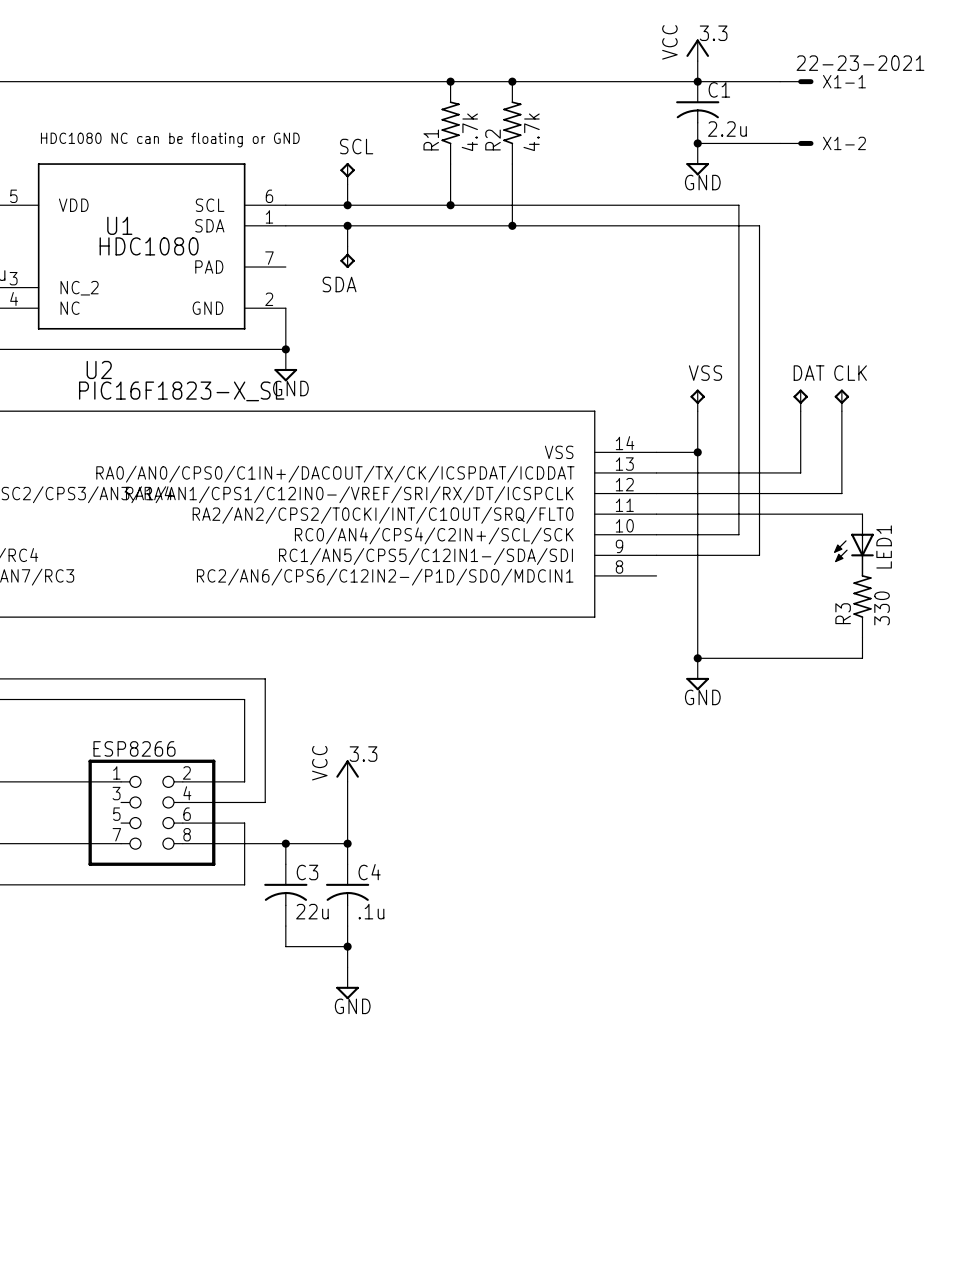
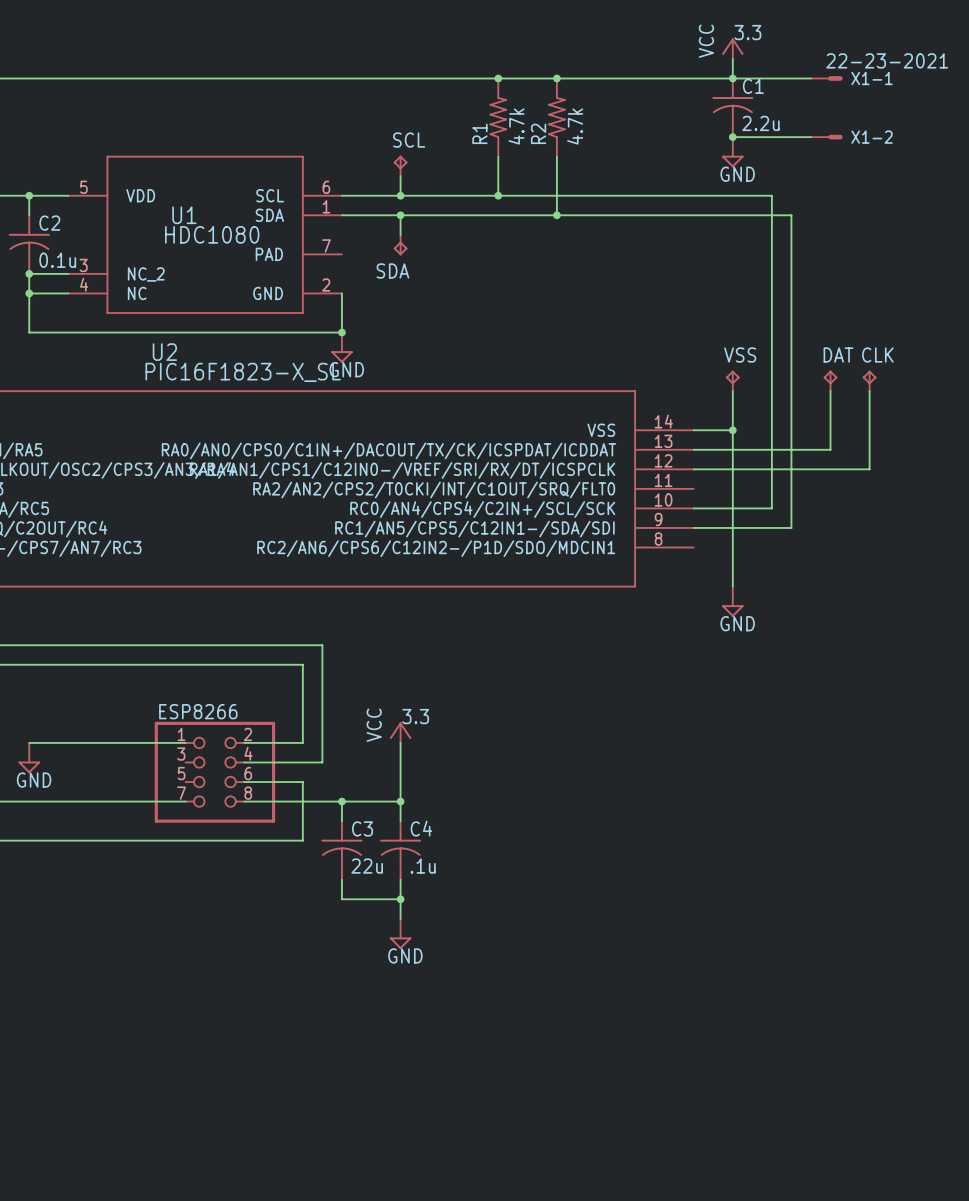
text: HDC1080 NC can be floating or GND (170, 140) -> none
wire: (656, 514) (862, 514) -> none
LED1: (853, 545) -> none
R3: 330 (862, 596) -> none
wire: (697, 617) (697, 658) (862, 658) (862, 637) -> none
junction: (697, 658) -> none
power symbol position: GND (697, 674) -> GND (732, 601)

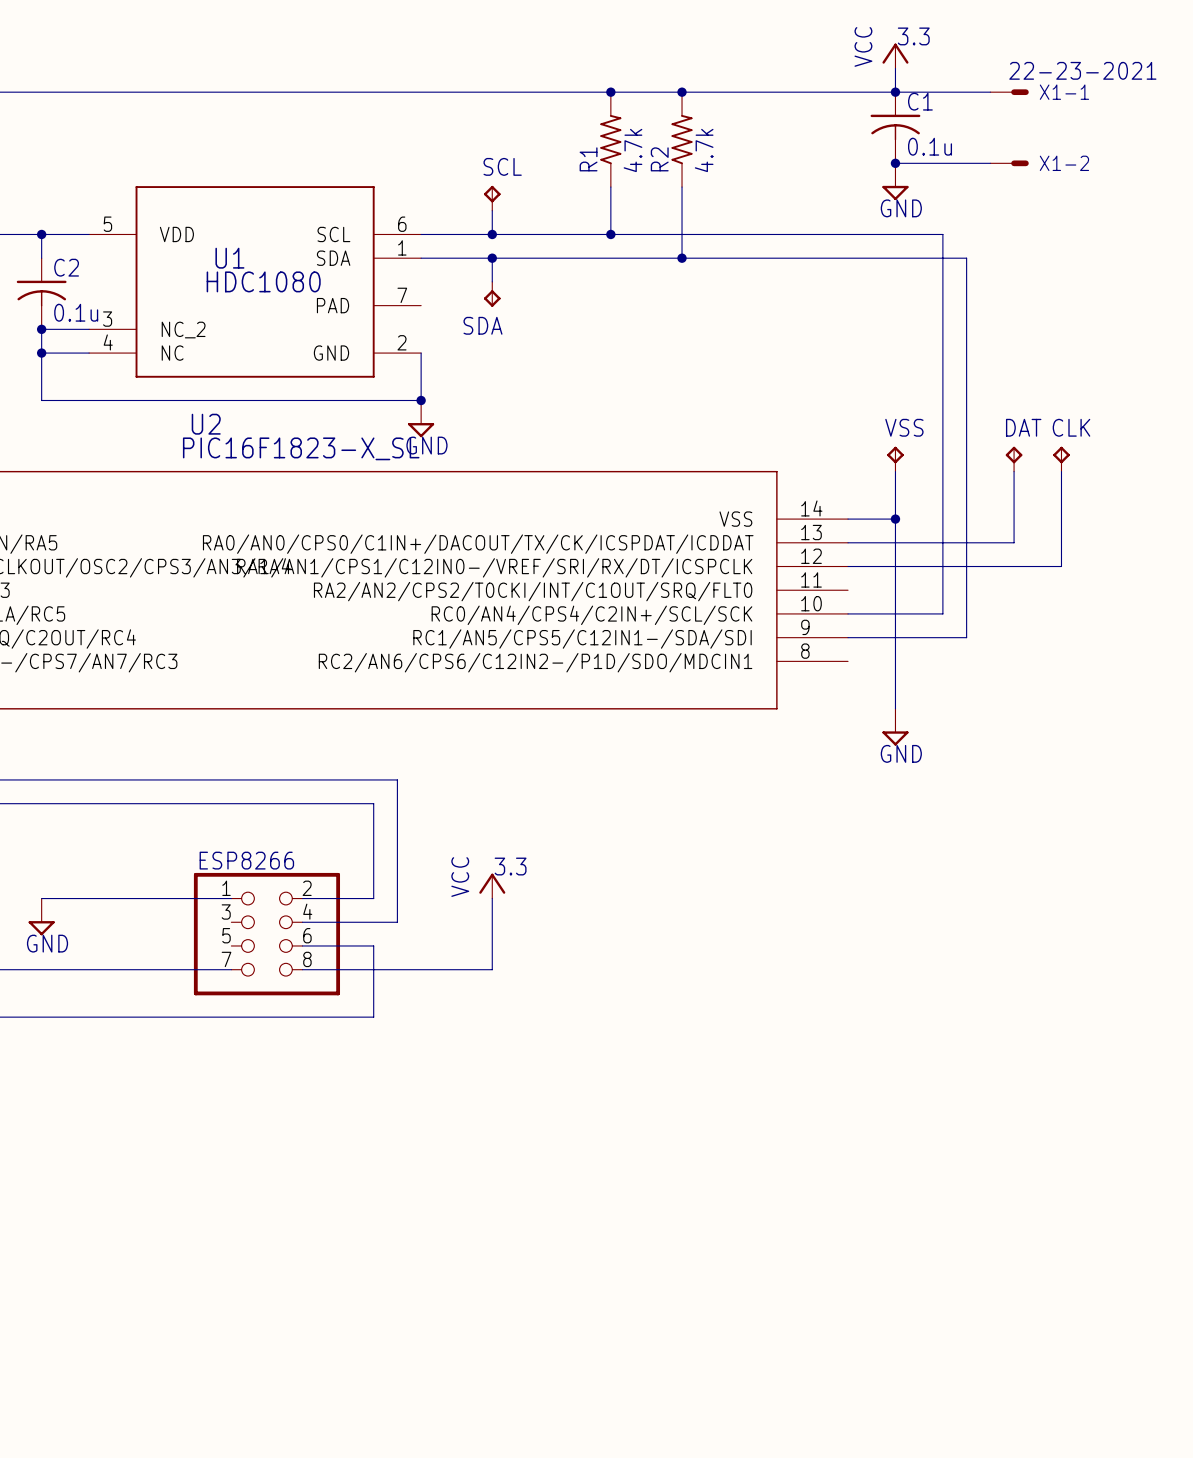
C1 value: 2.2u (760, 123) -> 0.1u (930, 146)
wire: (341, 801) (341, 821) -> none
junction: (341, 801) -> none
wire: (400, 801) (400, 821) -> none
junction: (400, 801) -> none
C3: 22u (341, 850) -> none
C4: .1u (400, 850) -> none
wire: (341, 879) (341, 899) (400, 899) -> none
wire: (400, 879) (400, 918) -> none
junction: (400, 899) -> none
power symbol: GND (400, 933) -> none

